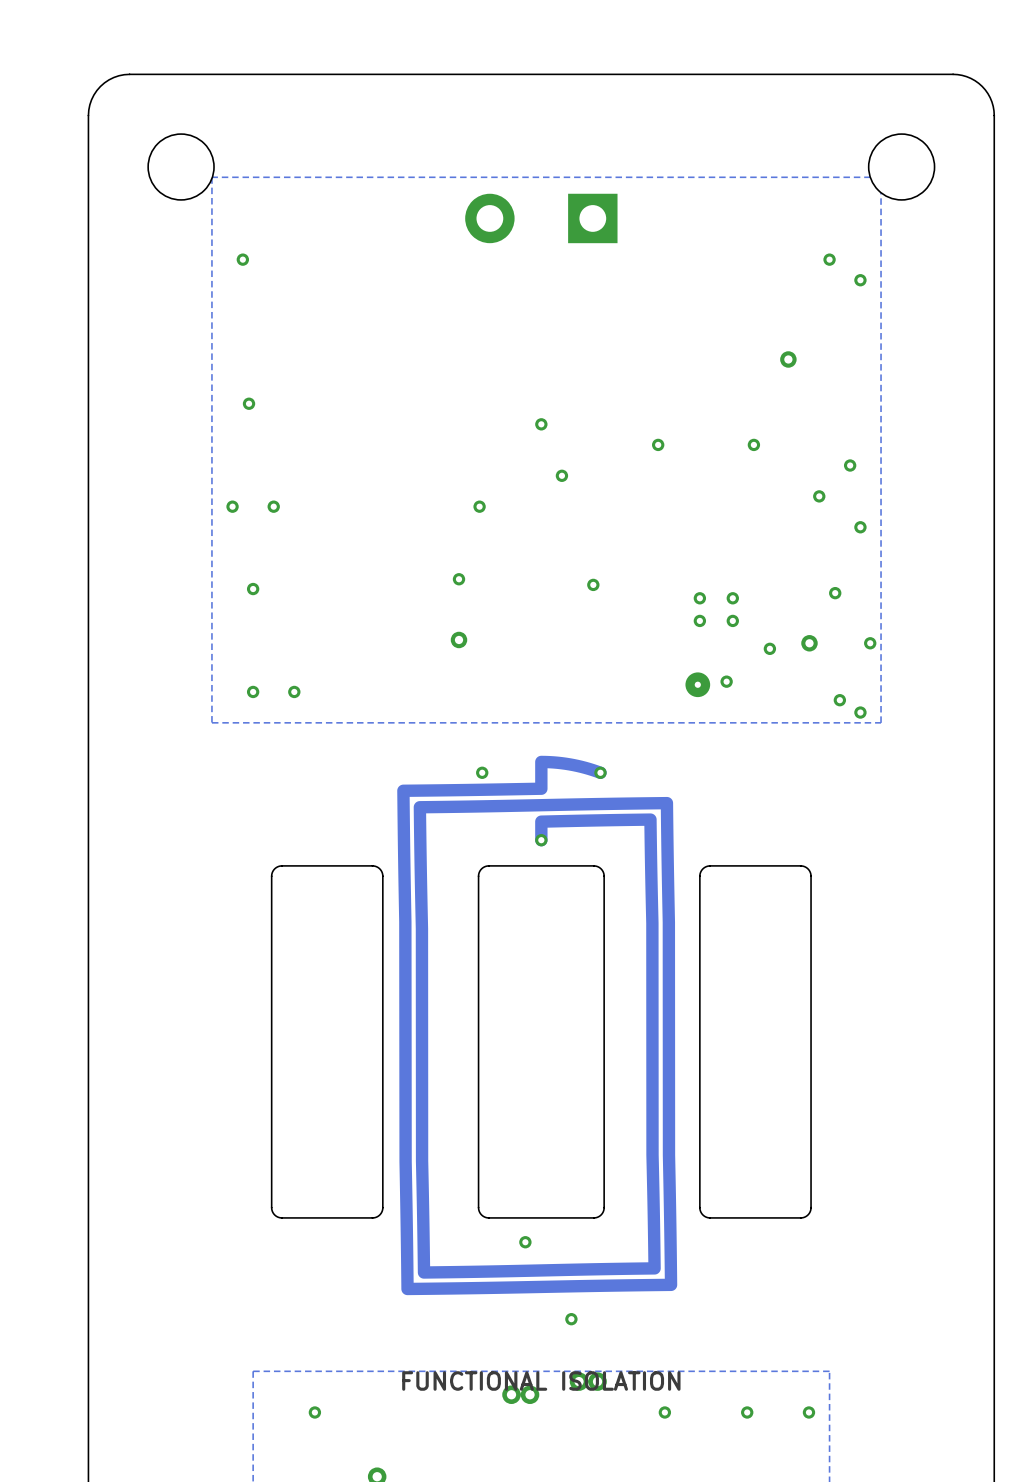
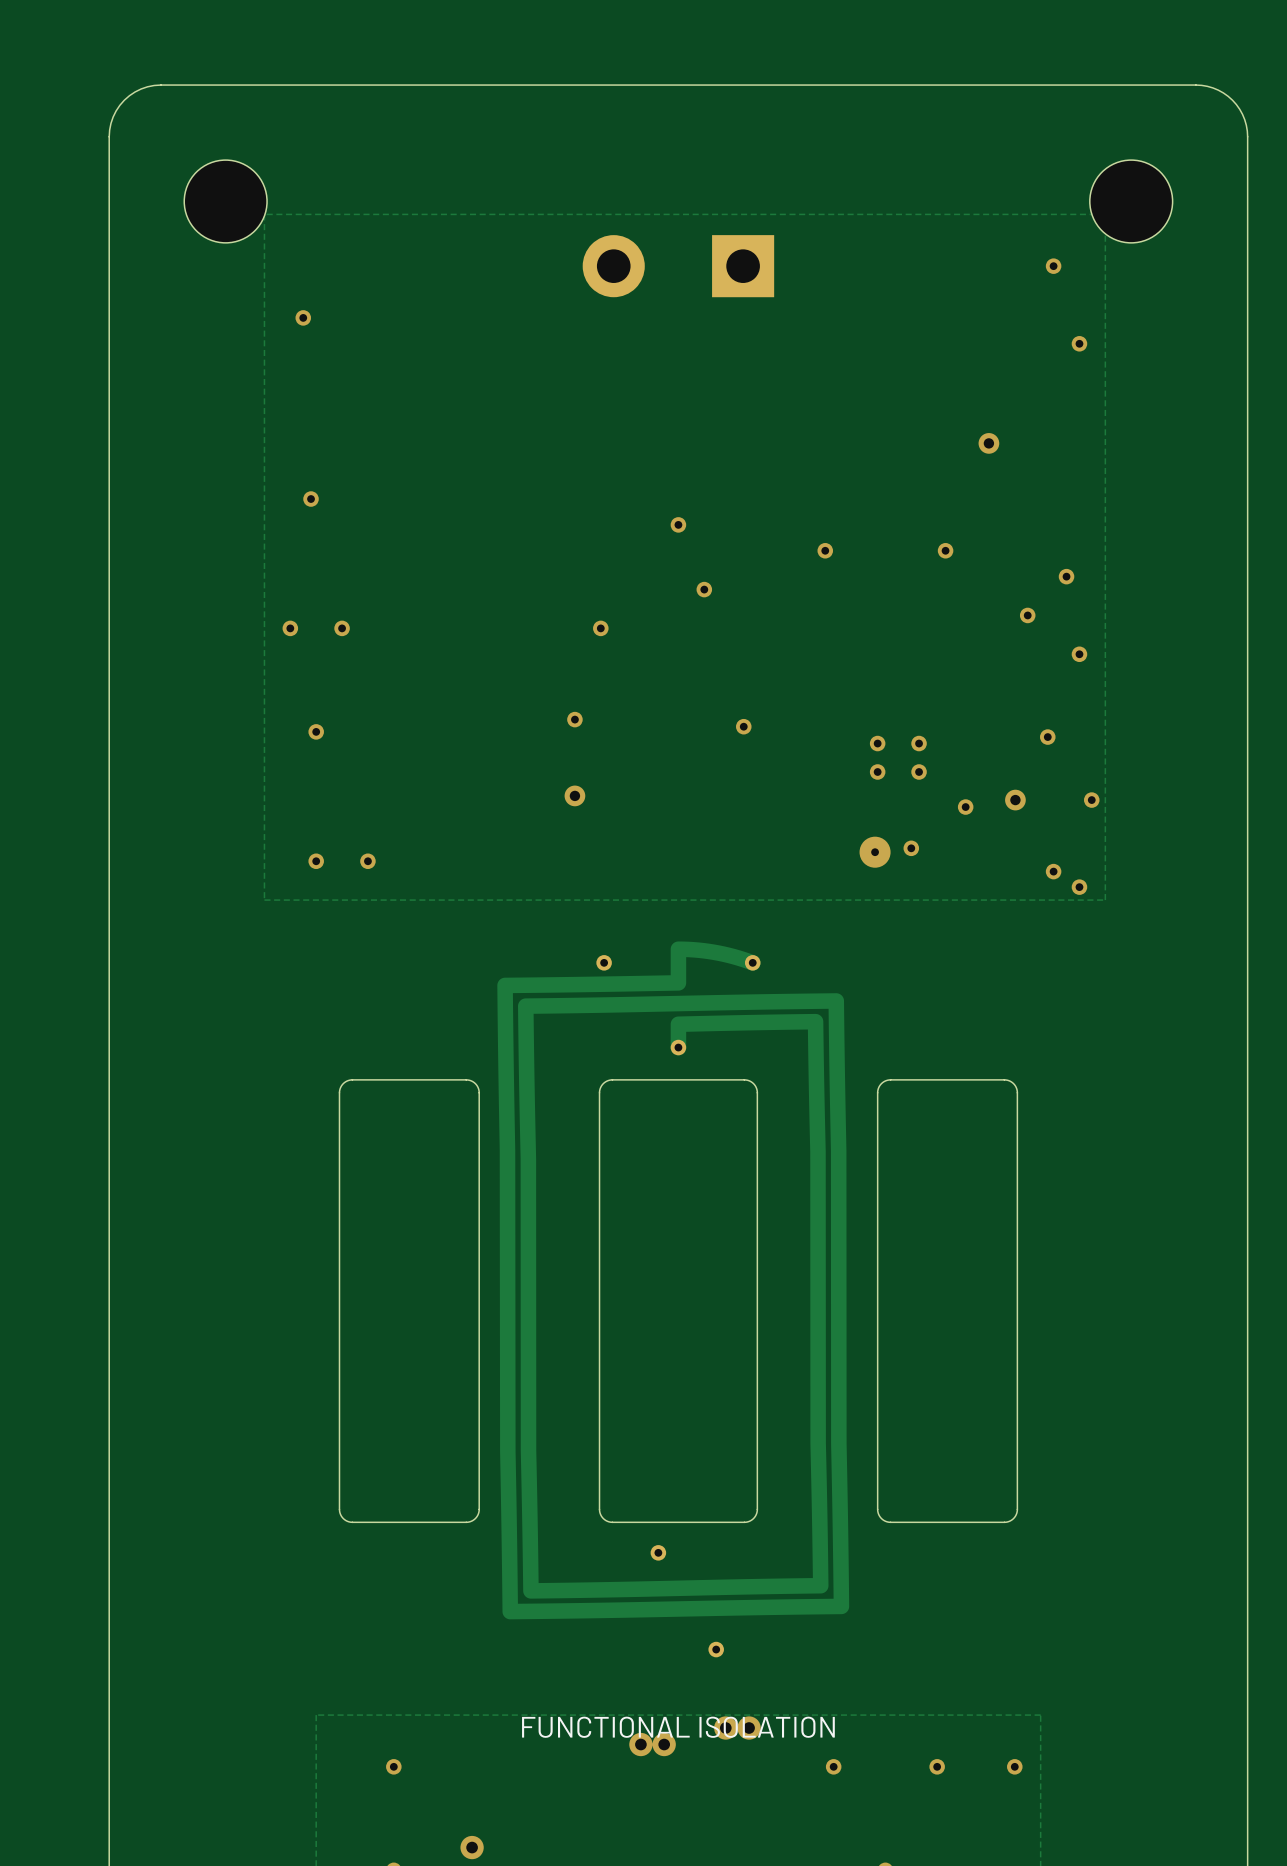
via position: (829, 259) -> (1053, 266)

